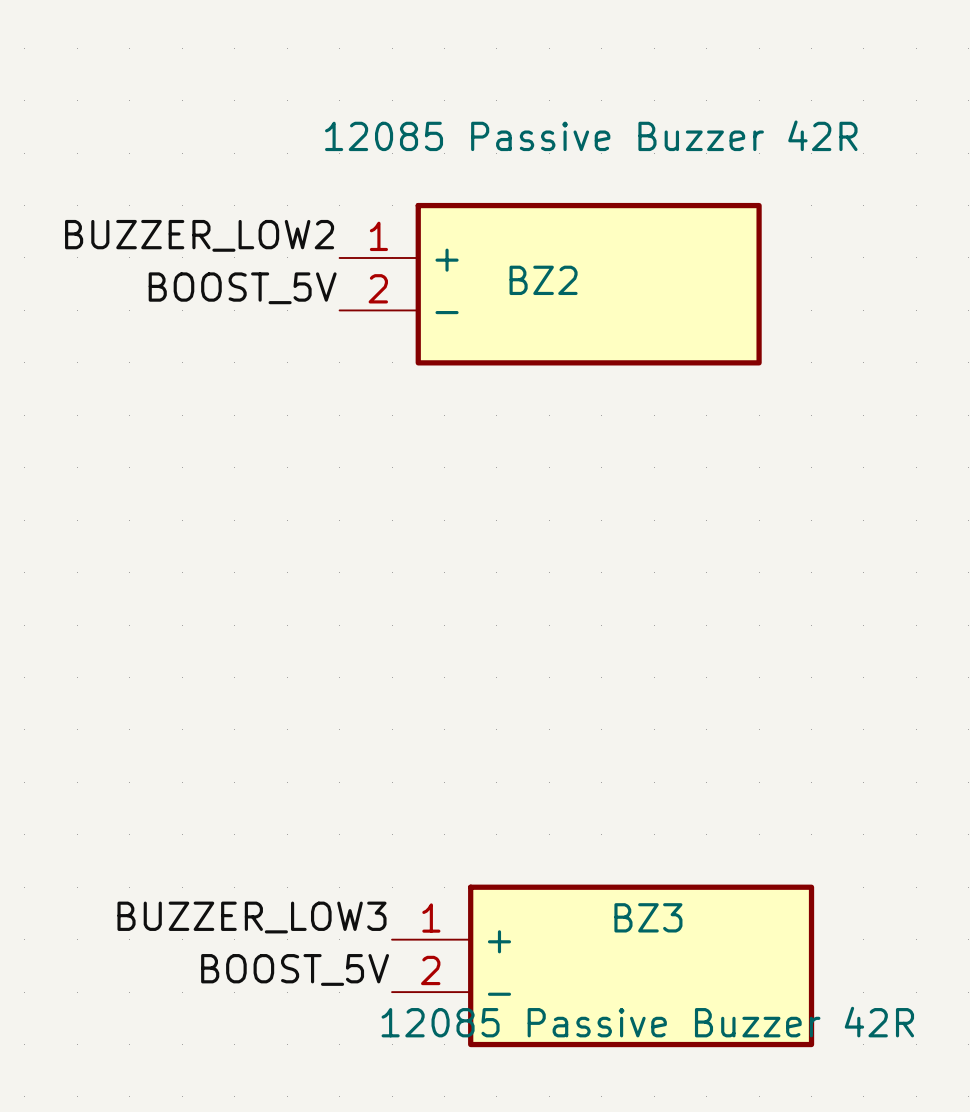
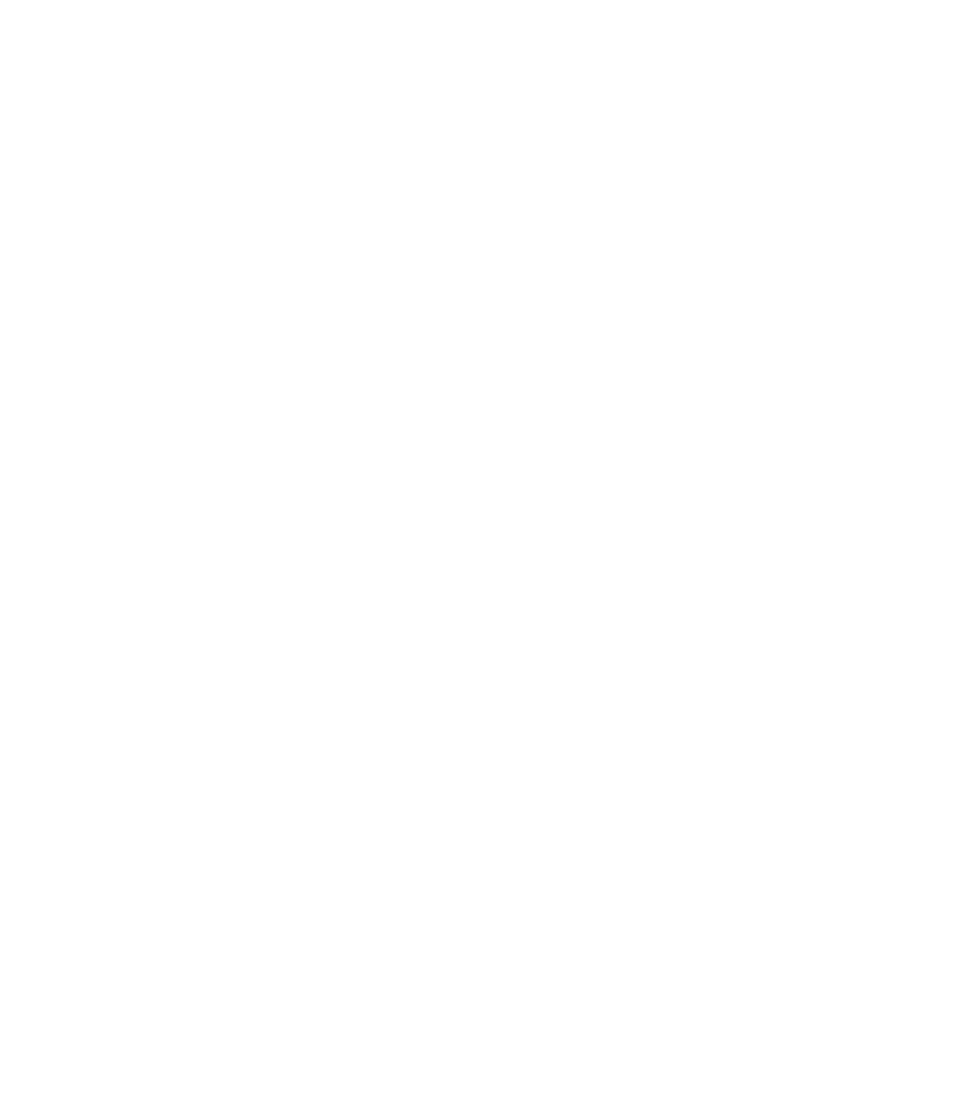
label: BUZZER_LOW2 (199, 235) -> none
BZ2: 12085 Passive Buzzer 42R (550, 284) -> none
label: BOOST_5V (242, 288) -> none
label: BUZZER_LOW3 (252, 917) -> none
BZ3: 12085 Passive Buzzer 42R (603, 965) -> none
label: BOOST_5V (295, 969) -> none

